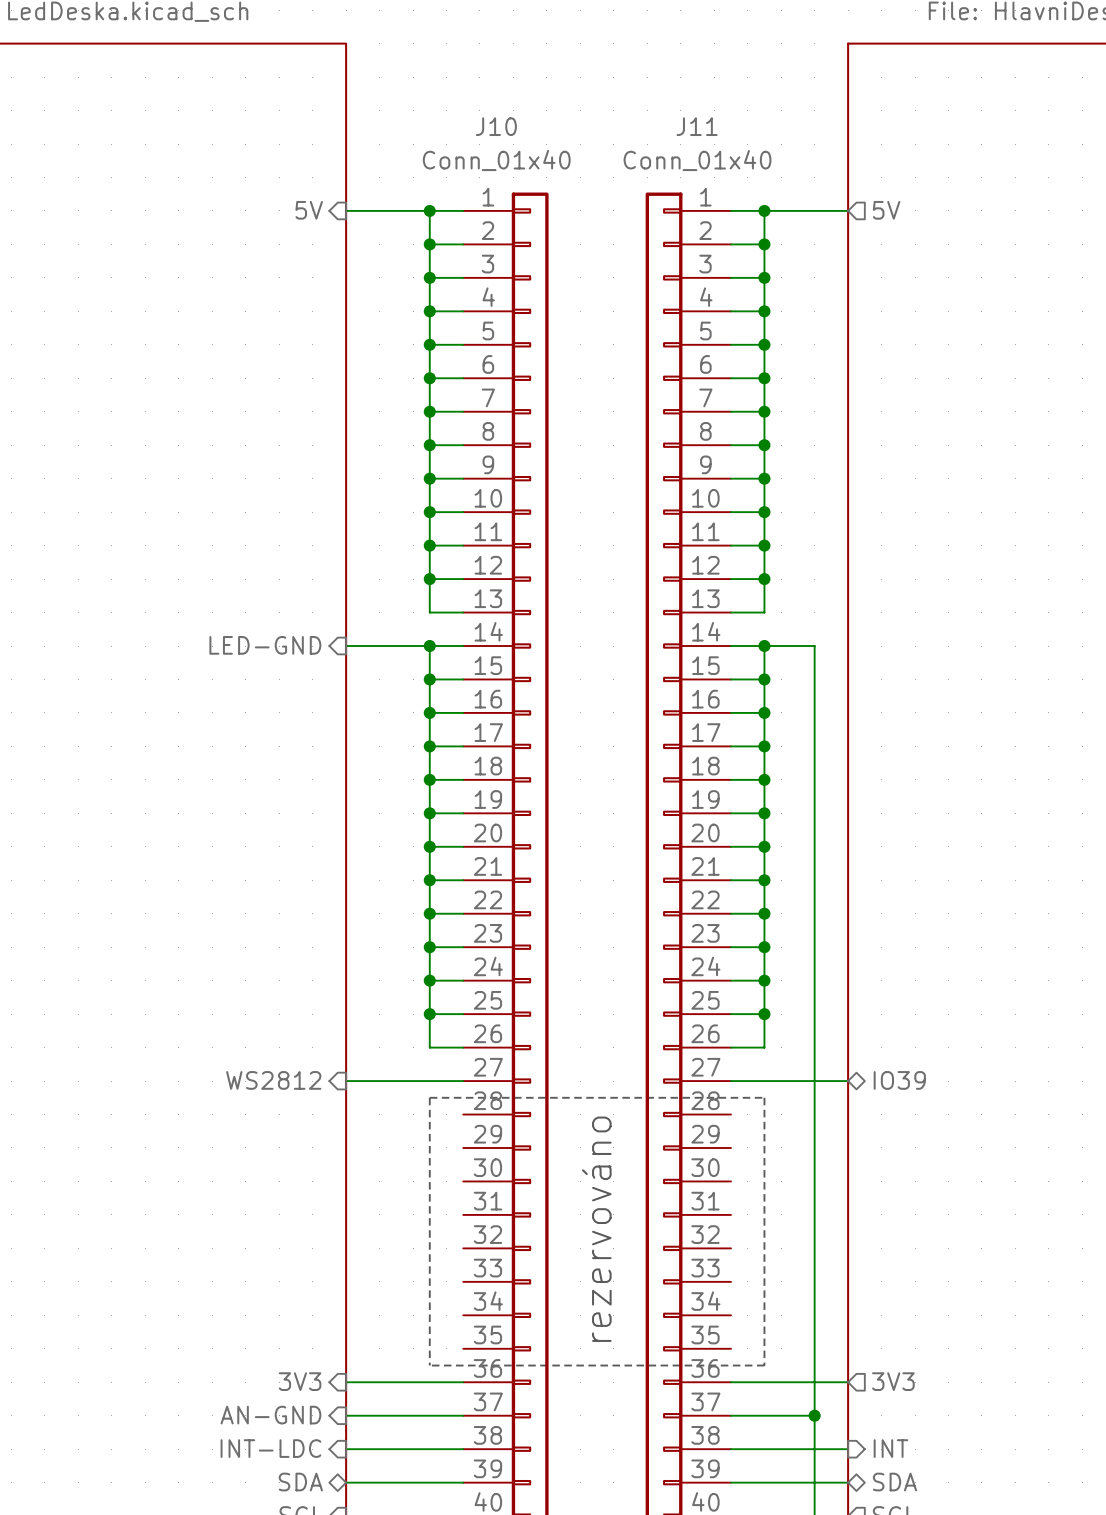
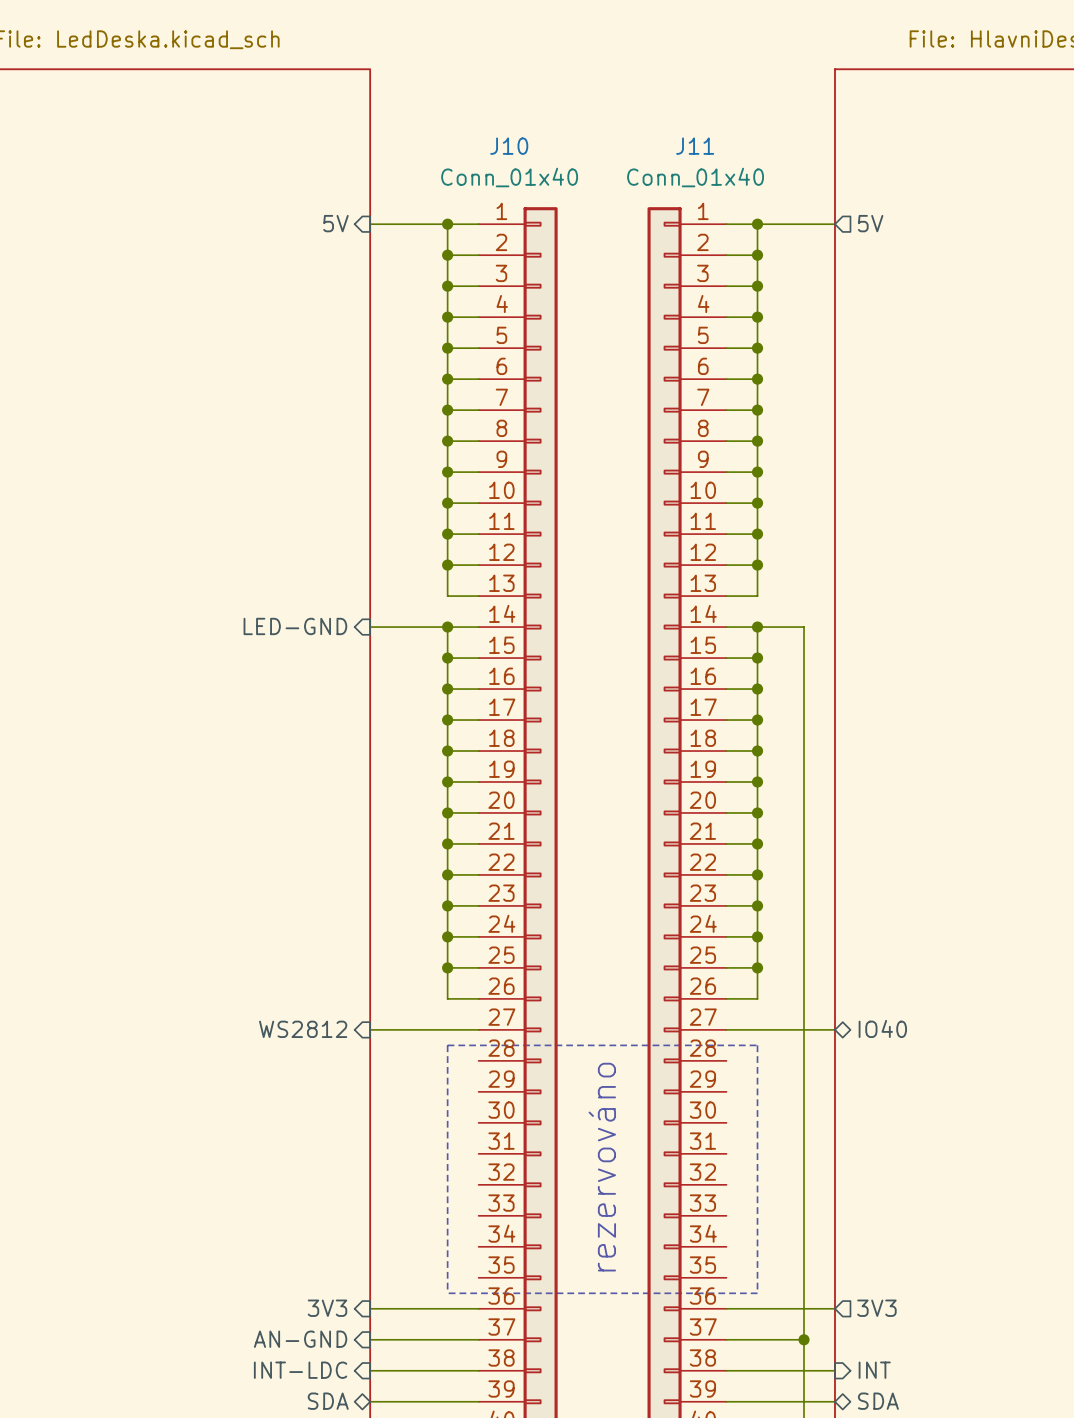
sheet pin: IO39 (899, 1080) -> IO40 (882, 1028)

